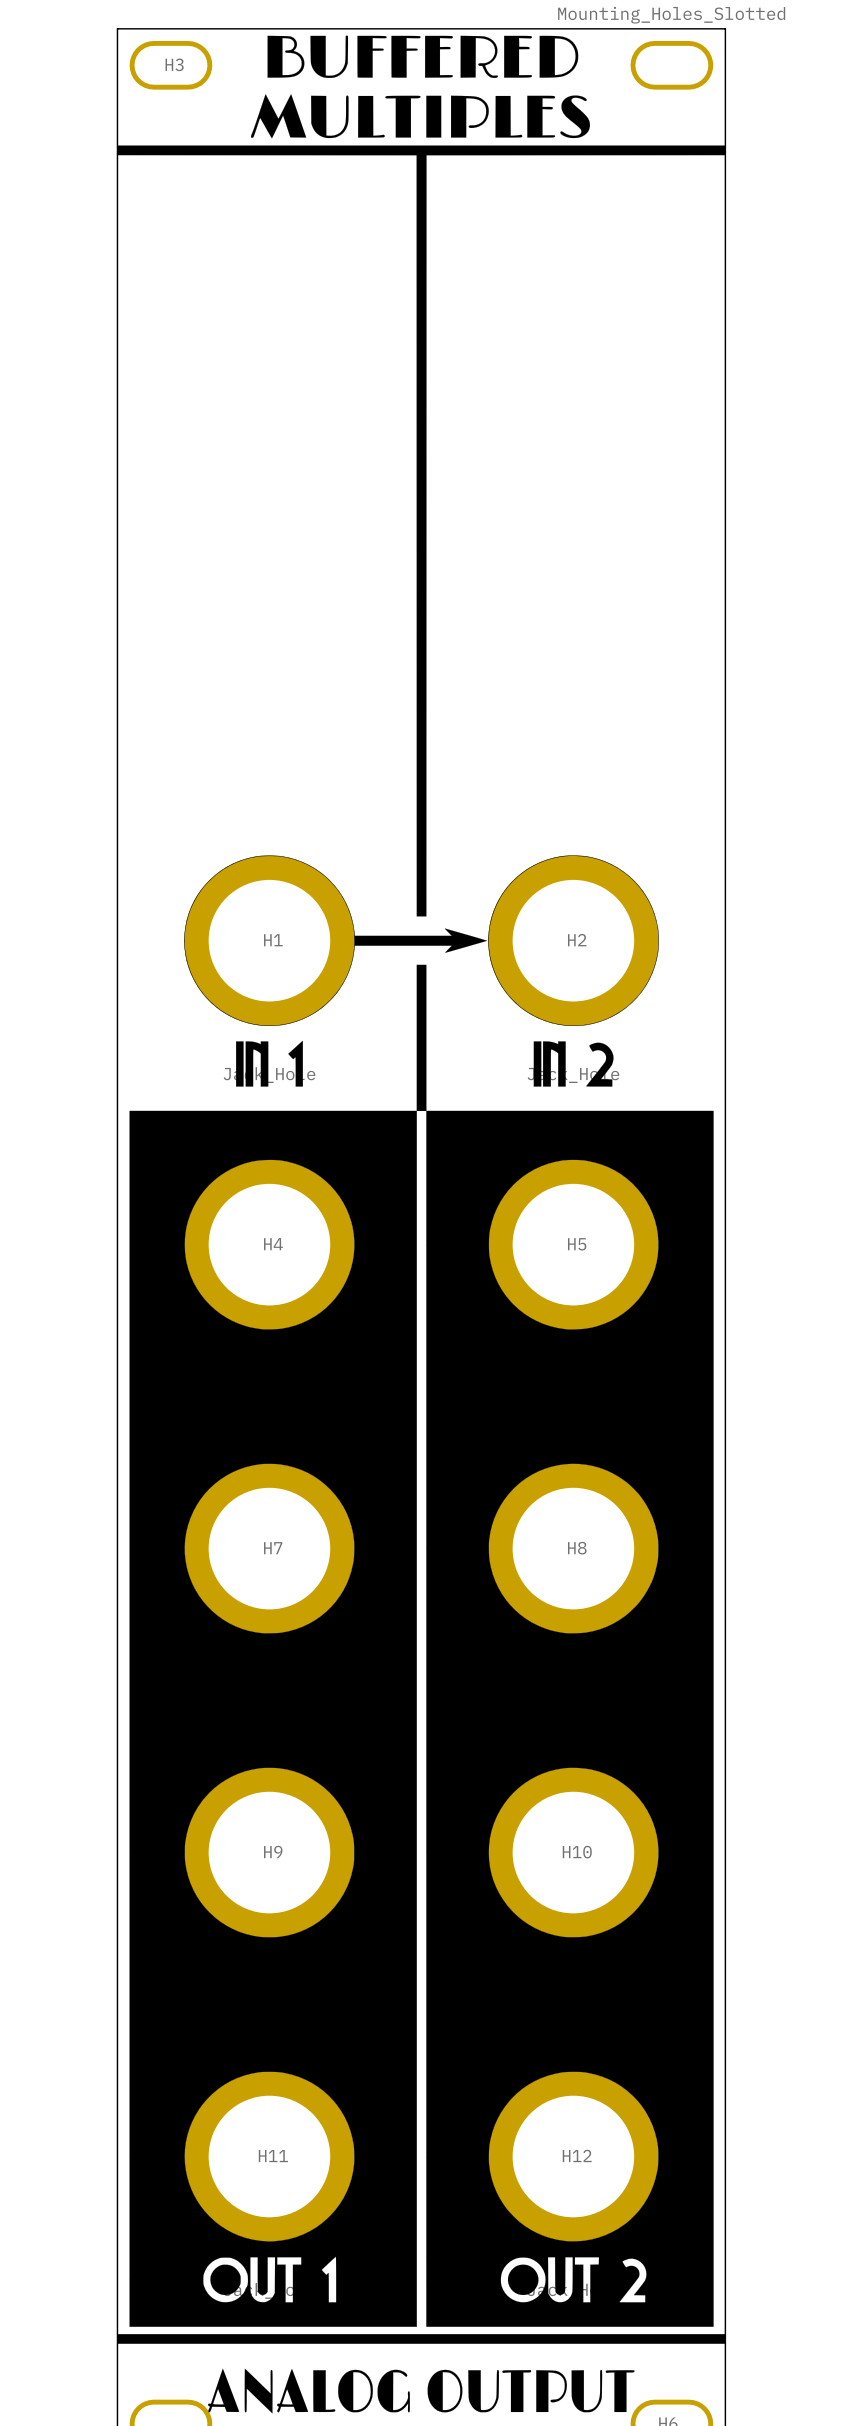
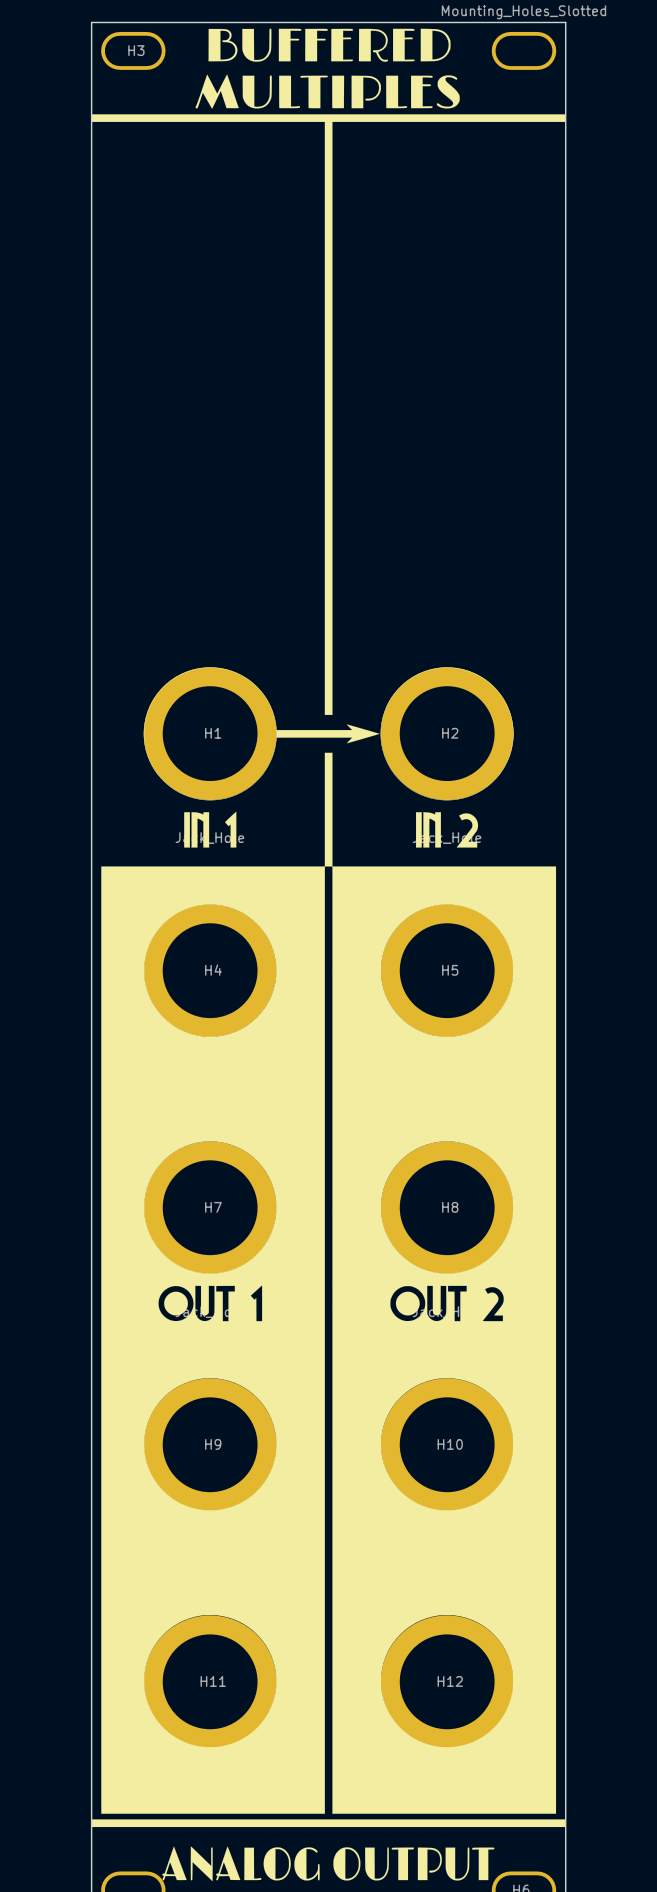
drawing shape: [117, 35, 726, 2414] -> [91, 28, 566, 1882]

